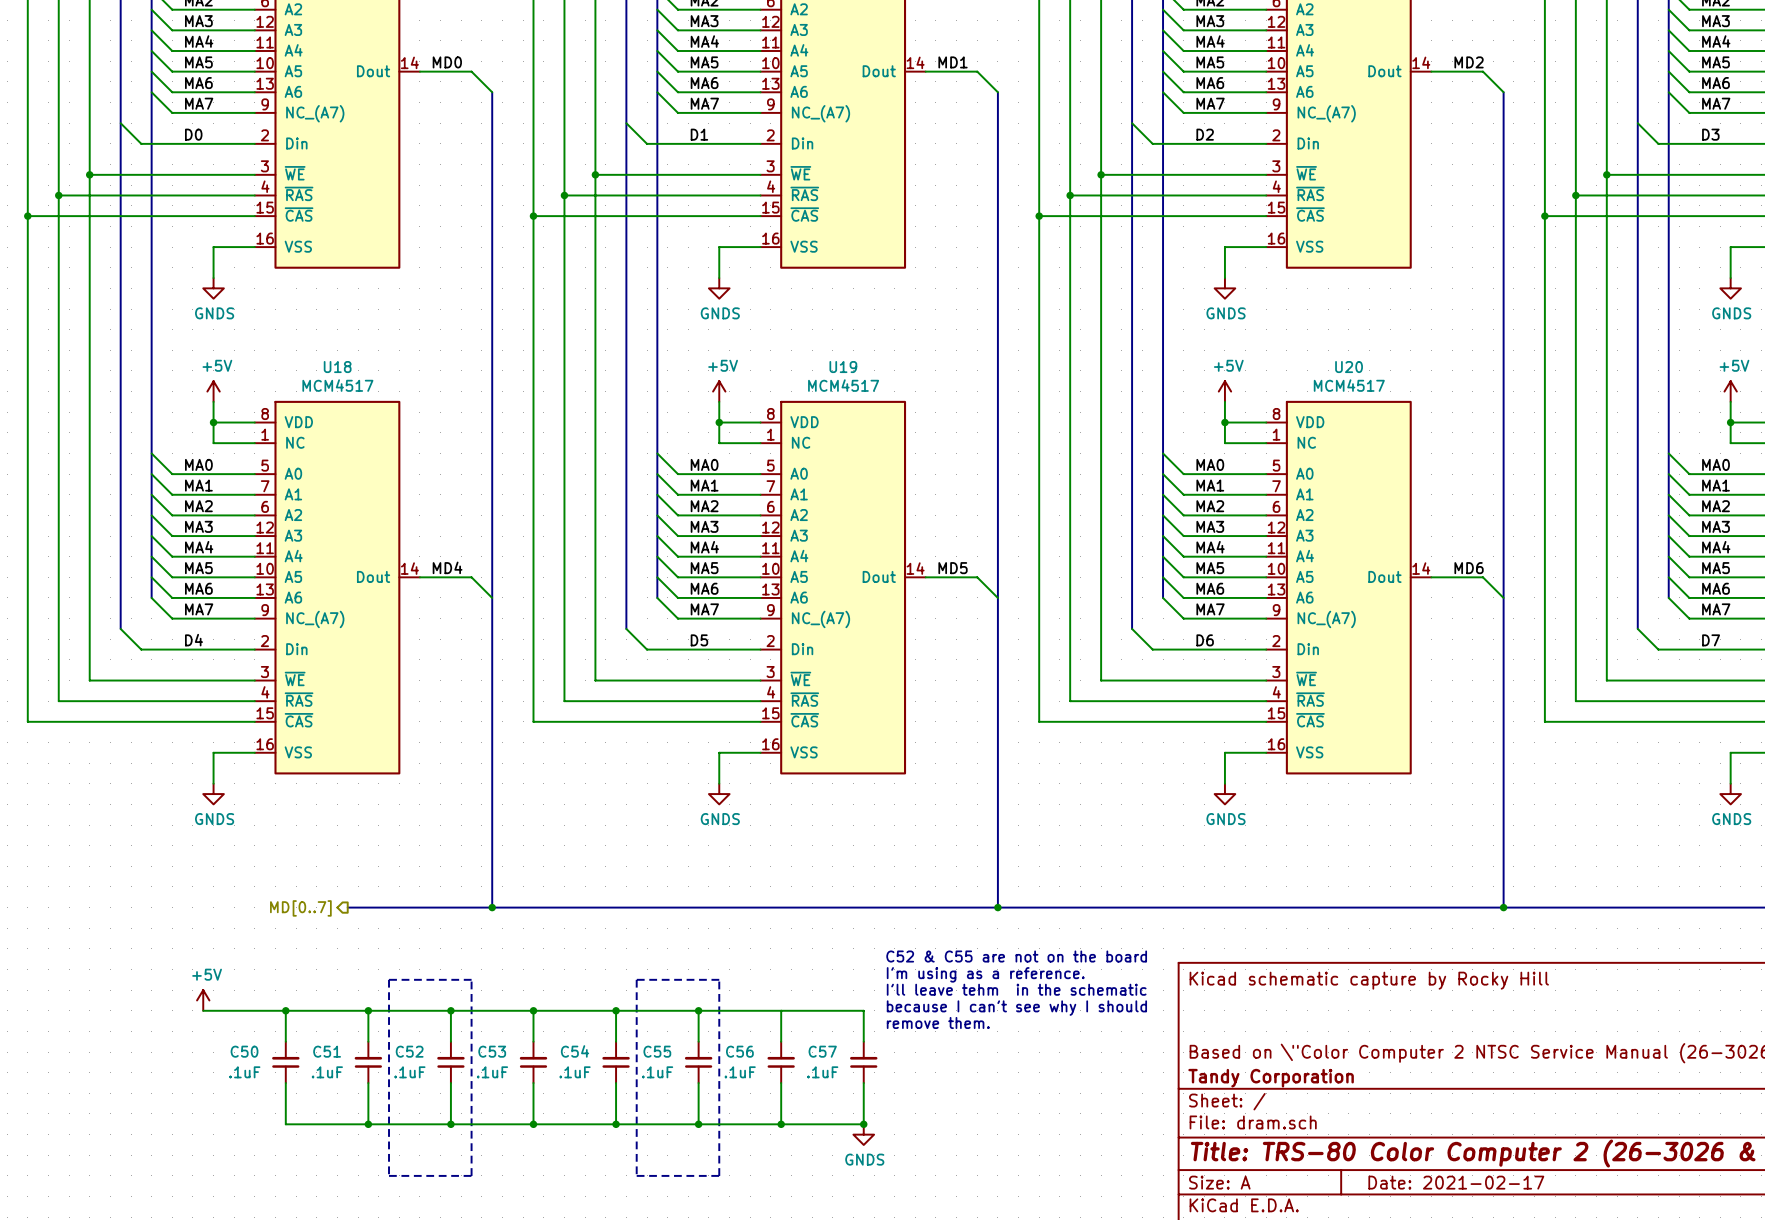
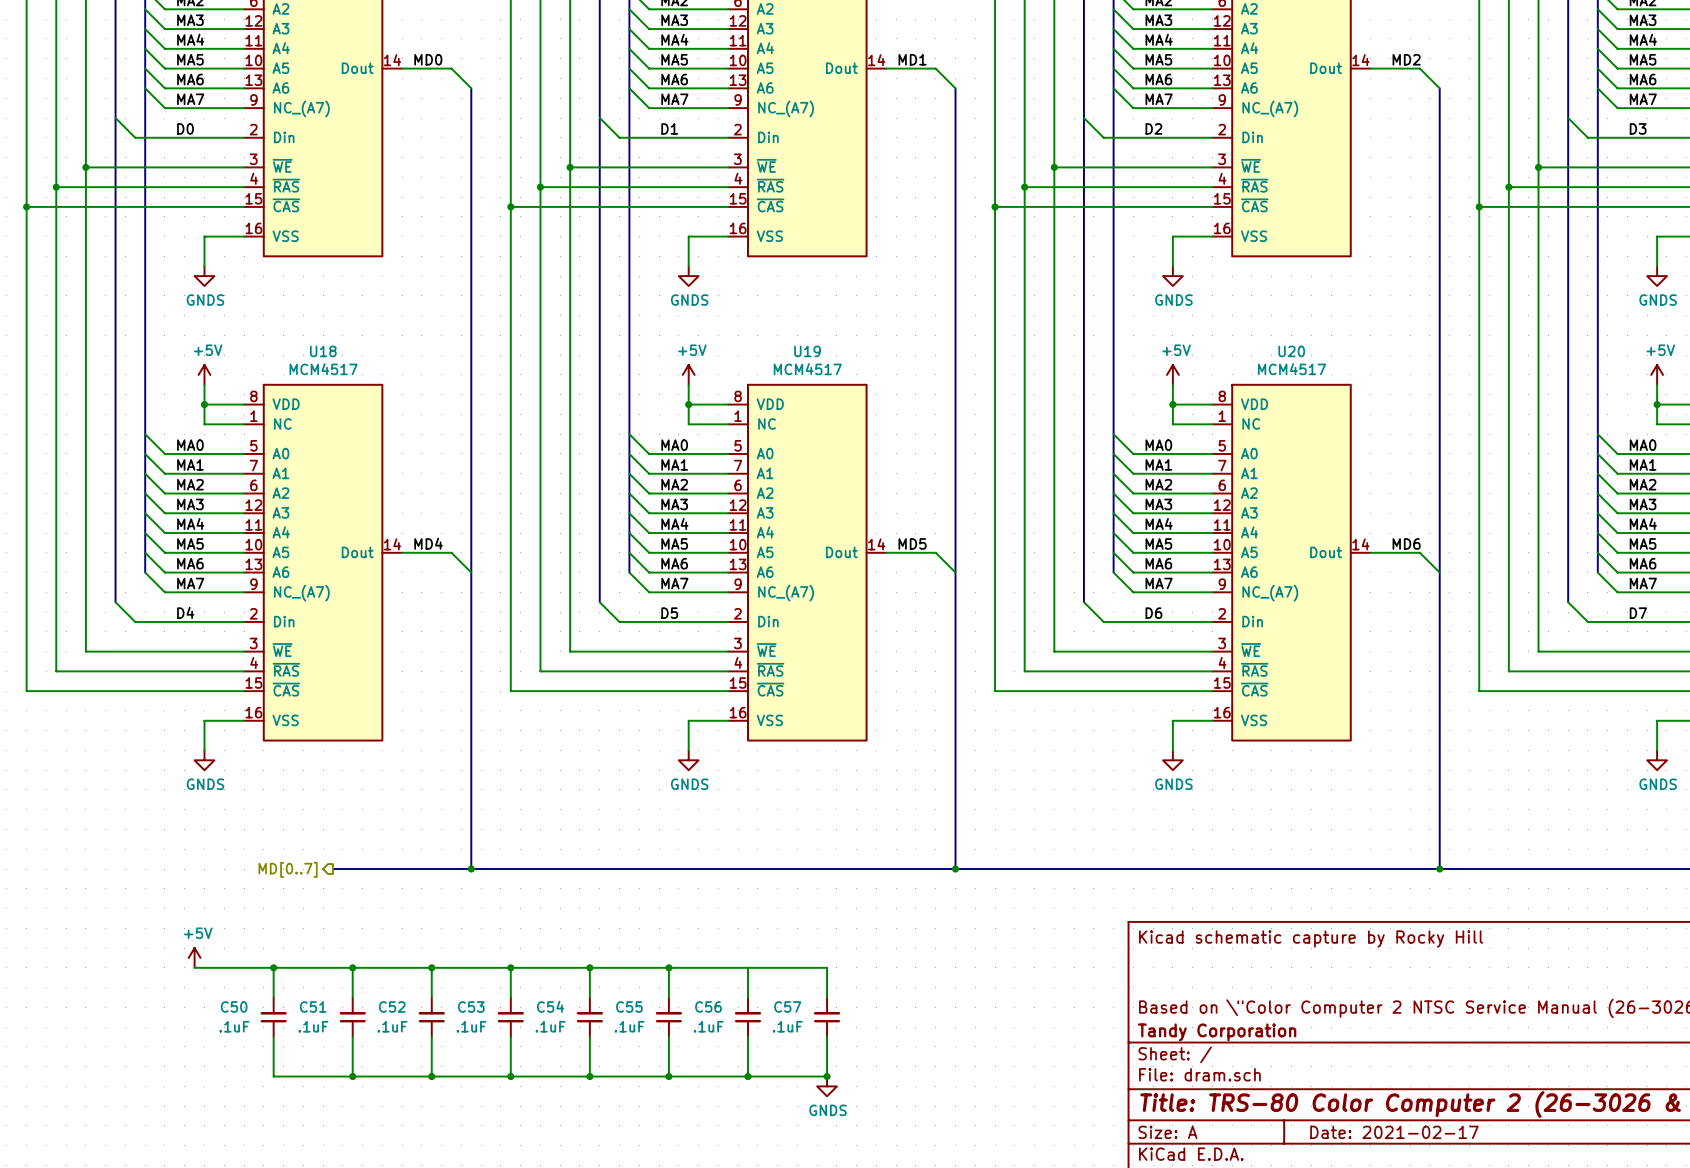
text: C52 & C55 are not on the board (1016, 956) -> none
text: I'm using as a reference. (985, 974) -> none
line: (389, 979) (471, 979) (471, 1175) (389, 1175) (389, 979) -> none
line: (636, 979) (719, 979) (719, 1175) (636, 1175) (636, 979) -> none
text: I'll leave tehm in the schematic (1016, 989) -> none
text: because I can't see why I should (1016, 1008) -> none
text: remove them. (938, 1022) -> none

